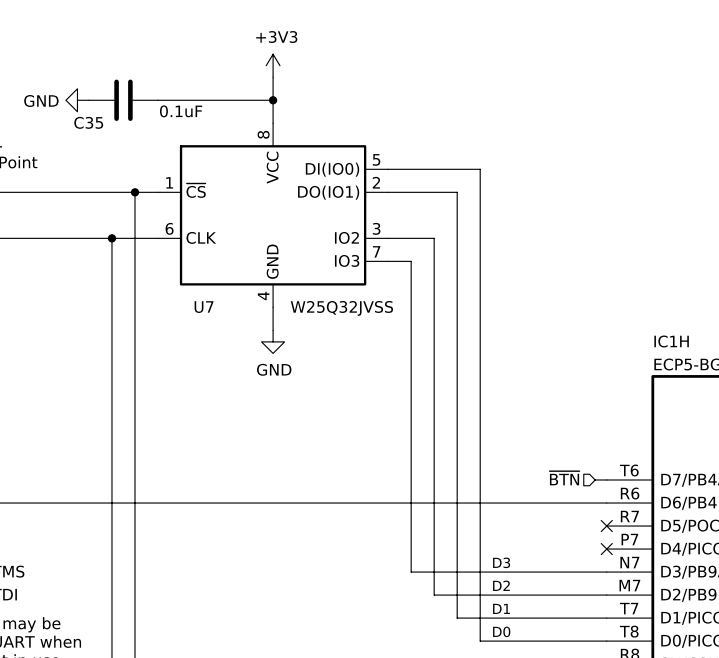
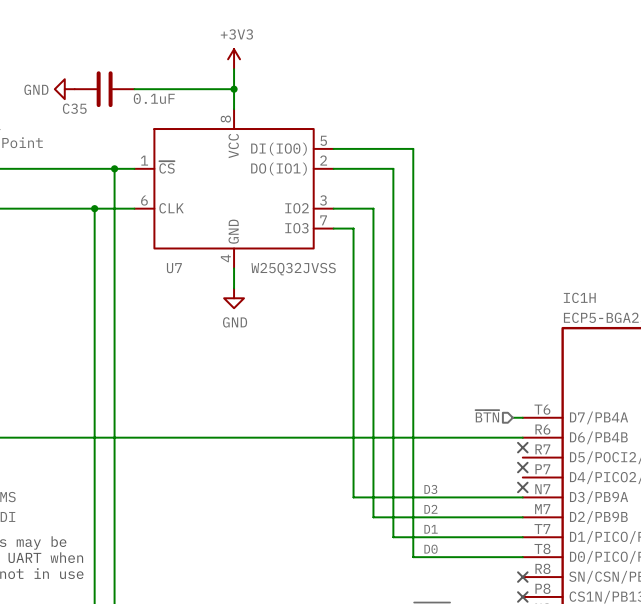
no-connect mark: none -> (522, 447)
no-connect mark: (606, 526) -> none
no-connect mark: none -> (522, 467)
no-connect mark: (606, 549) -> none
no-connect mark: none -> (522, 487)

